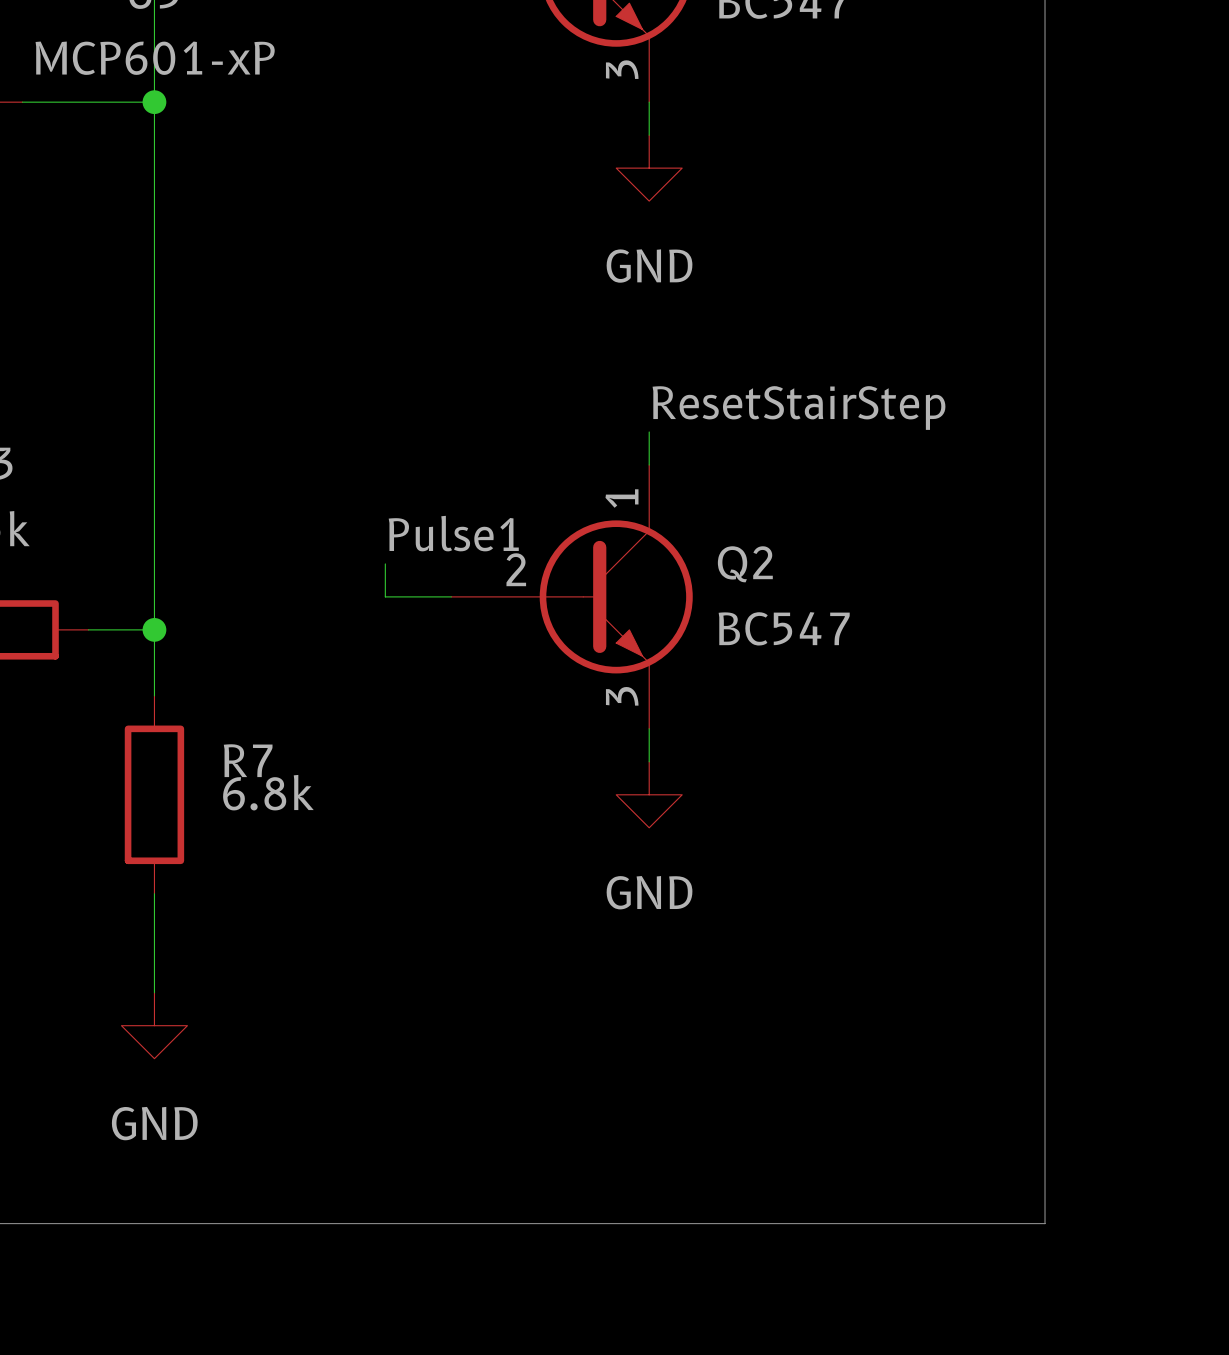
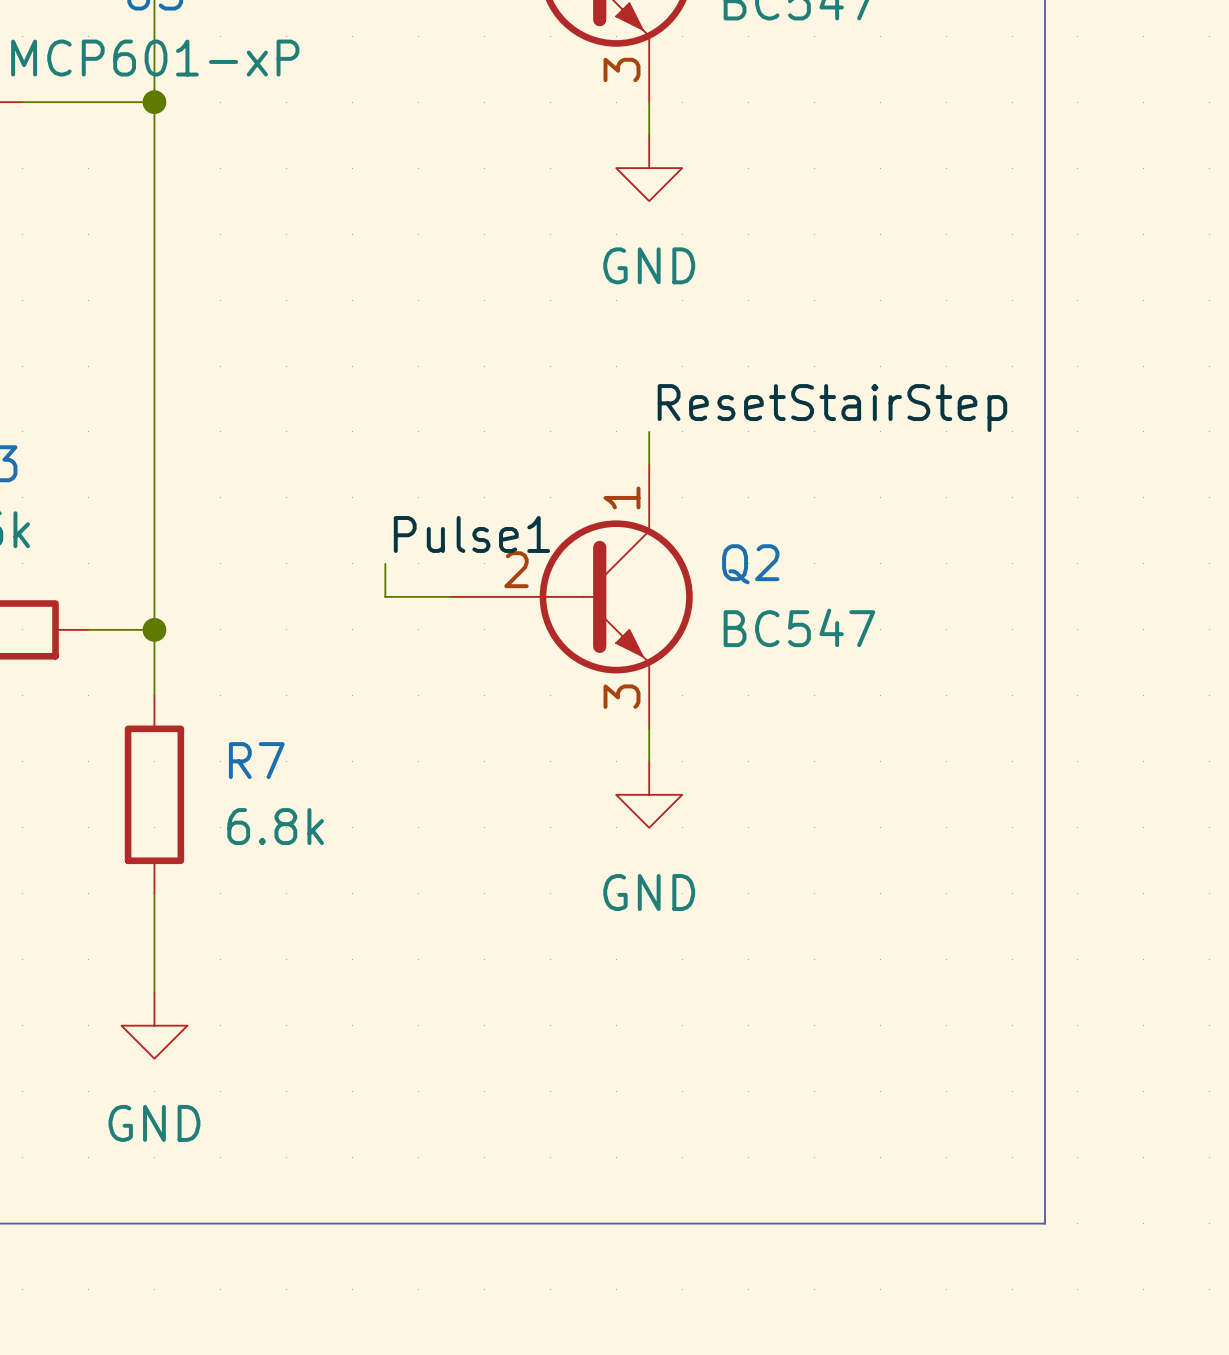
R7 value position: 6.8k (268, 792) -> 6.8k (275, 826)

